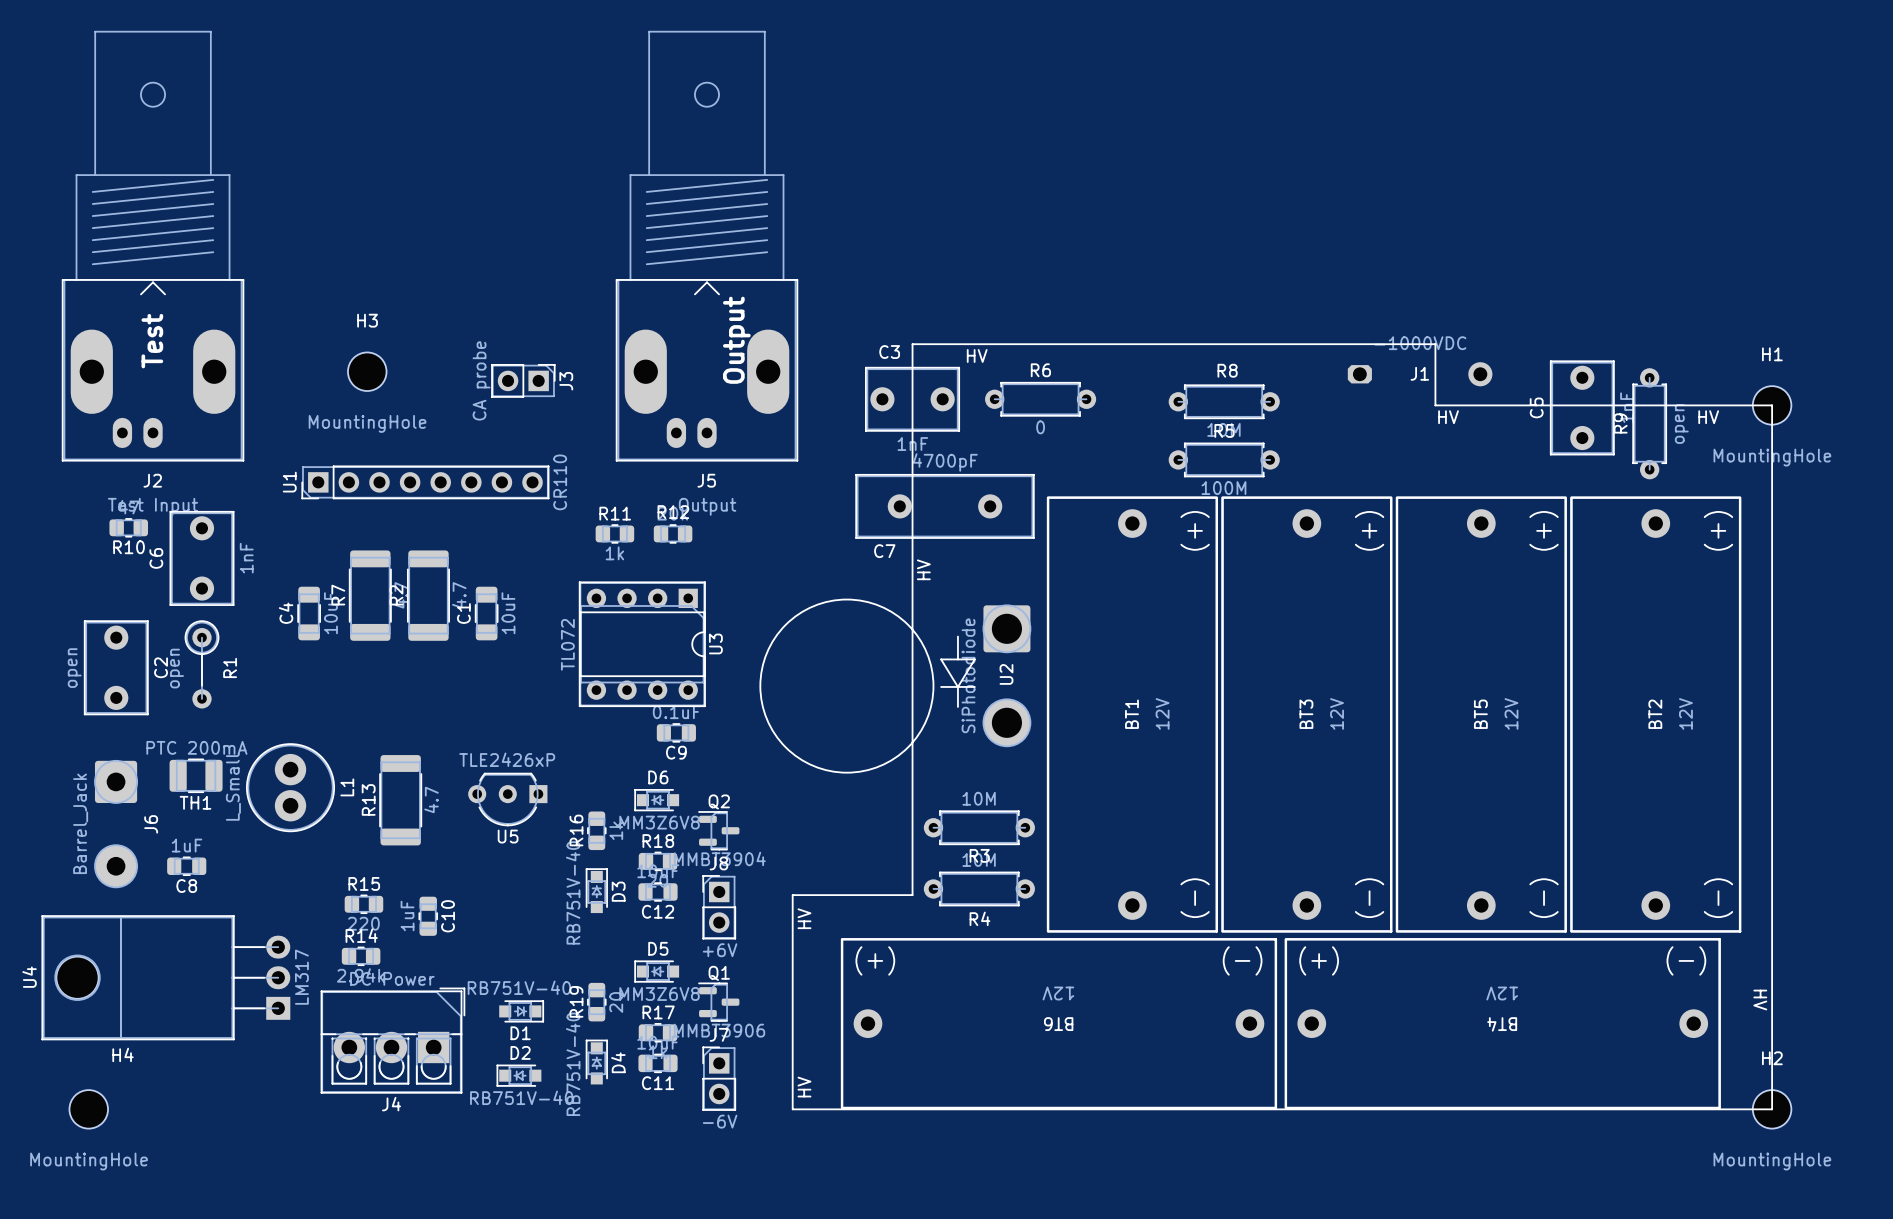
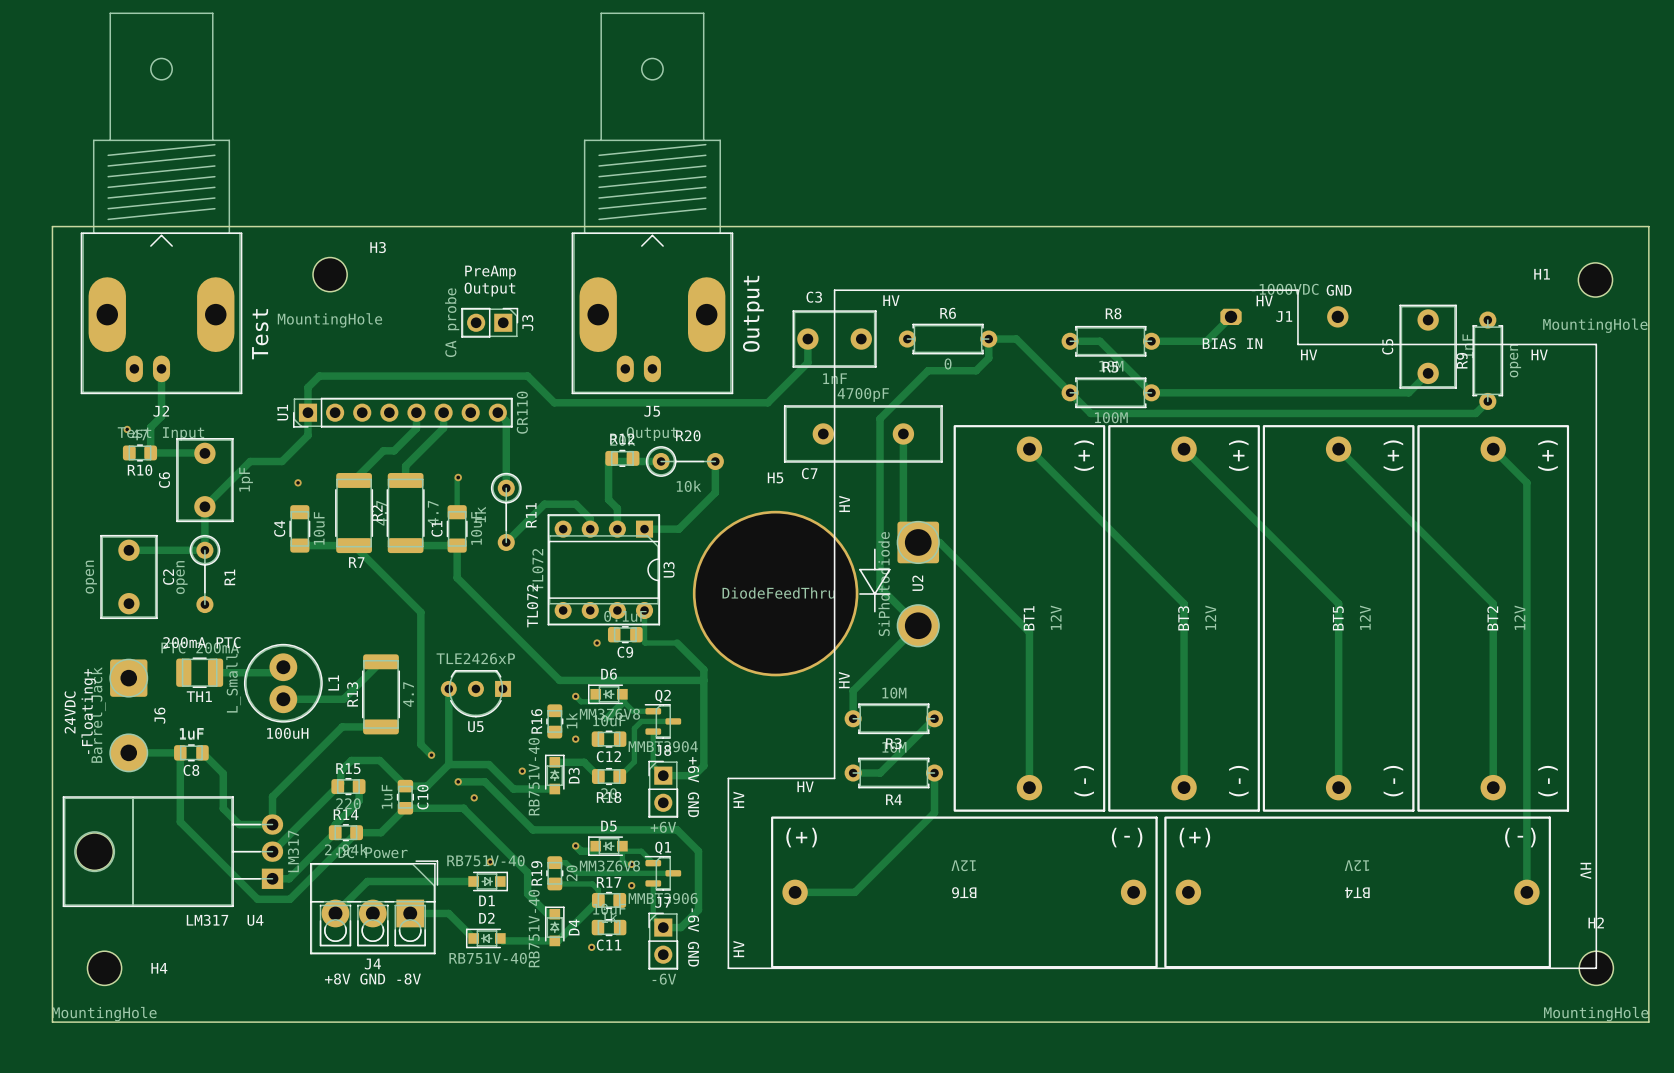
board edge: none -> (52, 226) (52, 1022) (1648, 1022) (1648, 226) (52, 226)
H3 name position: H3 (367, 320) -> H3 (378, 247)
text: none -> PreAmp (490, 272)
text position: Output (736, 340) -> Output (753, 313)
text position: Test (152, 341) -> Test (260, 334)
text: none -> Output (489, 289)
text: none -> GND (1339, 290)
H1 name position: H1 (1772, 354) -> H1 (1542, 274)
text: none -> HV (1264, 300)
H3 position: (367, 371) -> (330, 274)
track: none -> (1231, 316) (1206, 341) (1151, 341)
track: none -> (807, 339) (807, 362) (767, 402) (554, 402) (527, 376) (319, 376) (307, 387) (307, 435) (282, 461) (250, 461) (204, 506) (204, 550) (128, 550)
track: none -> (1070, 341) (1099, 341) (1151, 392) (1408, 392) (1428, 373)
text: none -> BIAS IN (1232, 343)
H1 position: (1772, 405) -> (1595, 279)
track: none -> (161, 368) (161, 416) (150, 427) (150, 452) (204, 453)
track: none -> (1487, 401) (1475, 413) (1090, 413) (1016, 339) (988, 339) (988, 358) (976, 370) (928, 370) (880, 418) (880, 587) (918, 625) (853, 690) (853, 718)
track: none -> (416, 412) (416, 428) (394, 450) (383, 450) (354, 480)
track: none -> (443, 412) (443, 428) (405, 466) (405, 480)
track: none -> (497, 412) (506, 421) (506, 488)
via: none -> (127, 429)
track: none -> (903, 433) (903, 527) (918, 542) (939, 542) (1029, 632) (1029, 787)
R11 name position: R11 (615, 513) -> R11 (531, 515)
track: none -> (1029, 449) (1184, 603) (1184, 787)
track: none -> (1184, 449) (1338, 603) (1338, 787)
track: none -> (1338, 449) (1493, 603) (1493, 787)
track: none -> (1493, 449) (1526, 482) (1526, 892)
R11 footprint: [595, 524, 635, 544] -> [491, 472, 522, 551]
track: none -> (661, 461) (608, 461) (608, 499) (617, 508) (617, 529)
R20: none -> 10k (684, 461)
track: none -> (715, 461) (715, 492) (678, 529) (644, 529)
R11 value position: 1k (614, 553) -> 1k (480, 514)
track: none -> (458, 477) (457, 512)
via: none -> (458, 477)
C6 value: 1nF (246, 558) -> 1pF (246, 479)
via: none -> (298, 482)
text position: HV (923, 569) -> HV (844, 503)
R7 name rotation: 0° (338, 595) -> 90° clockwise (356, 562)
R7 name position: R7 (338, 595) -> R7 (356, 562)
drawing: [759, 598, 935, 774] -> none
track: none -> (590, 529) (590, 518) (575, 504) (544, 504) (506, 542)
track: none -> (299, 545) (354, 545) (420, 612) (420, 744) (431, 755)
track: none -> (405, 545) (457, 545) (457, 577) (559, 680) (703, 680)
U3 position: (642, 644) -> (603, 569)
H5: none -> DiodeFeedThru (775, 593)
text: none -> TL072 (532, 606)
track: none -> (644, 610) (645, 643) (677, 643) (703, 669) (703, 765) (693, 775) (663, 775) (653, 765) (653, 731)
text: none -> 200mA PTC (201, 642)
via: none -> (597, 643)
track: none -> (381, 661) (343, 699) (283, 699)
track: none -> (283, 667) (277, 672) (215, 672)
text: none -> HV (844, 680)
track: none -> (448, 688) (448, 764)
track: none -> (575, 696) (581, 701) (597, 701)
via: none -> (575, 696)
track: none -> (653, 711) (633, 711) (623, 701) (607, 717)
text: none -> 24VDC (70, 712)
text: none -> -Floating+ (88, 711)
track: none -> (934, 718) (880, 773) (853, 773)
track: none -> (673, 721) (641, 721) (634, 728) (634, 761) (619, 776)
track: none -> (381, 726) (342, 726) (272, 796) (272, 824) (239, 824) (223, 808) (223, 773) (202, 752)
R18 name position: R18 (658, 841) -> R18 (609, 797)
text: none -> 1uF (191, 733)
text: none -> 100uH (287, 733)
via: none -> (575, 739)
R18 position: (658, 861) -> (609, 776)
track: none -> (128, 752) (180, 752) (180, 821) (257, 899) (289, 899) (356, 832) (381, 832) (405, 808) (463, 808) (527, 872) (527, 893) (547, 914) (554, 914)
via: none -> (431, 755)
track: none -> (554, 762) (584, 762) (598, 776)
track: none -> (448, 764) (489, 764) (513, 789) (554, 789)
track: none -> (448, 764) (427, 786) (405, 786) (379, 760) (351, 760) (340, 771) (340, 783) (272, 851)
via: none -> (522, 771)
track: none -> (934, 773) (934, 812) (854, 892) (795, 892)
C12 position: (658, 891) -> (609, 739)
track: none -> (458, 781) (484, 781) (532, 829) (677, 829) (698, 851) (698, 909) (680, 927) (663, 927) (653, 917) (653, 883)
via: none -> (458, 781)
track: none -> (359, 786) (359, 800) (335, 824) (335, 832) (289, 878) (272, 878)
text: none -> HV (805, 786)
text: none -> +6V GND (693, 787)
via: none -> (474, 797)
track: none -> (575, 845) (581, 851) (595, 851)
via: none -> (575, 845)
U4 name rotation: 0° (29, 977) -> 90° clockwise (255, 920)
U4 name position: U4 (29, 977) -> U4 (255, 920)
via: none -> (490, 861)
track: none -> (554, 862) (565, 862) (576, 873) (673, 873)
track: none -> (653, 863) (641, 851) (622, 851) (622, 860) (626, 864) (631, 864)
via: none -> (631, 864)
track: none -> (473, 881) (367, 881) (335, 913)
track: none -> (554, 883) (592, 883) (598, 889) (598, 900) (557, 940) (502, 940) (500, 938)
via: none -> (631, 885)
track: none -> (410, 913) (448, 913) (473, 938)
H4 name position: H4 (122, 1054) -> H4 (159, 968)
text: none -> LM317 (207, 920)
text: none -> -6V GND (693, 937)
via: none -> (591, 947)
text: none -> +8V GND -8V (372, 979)

